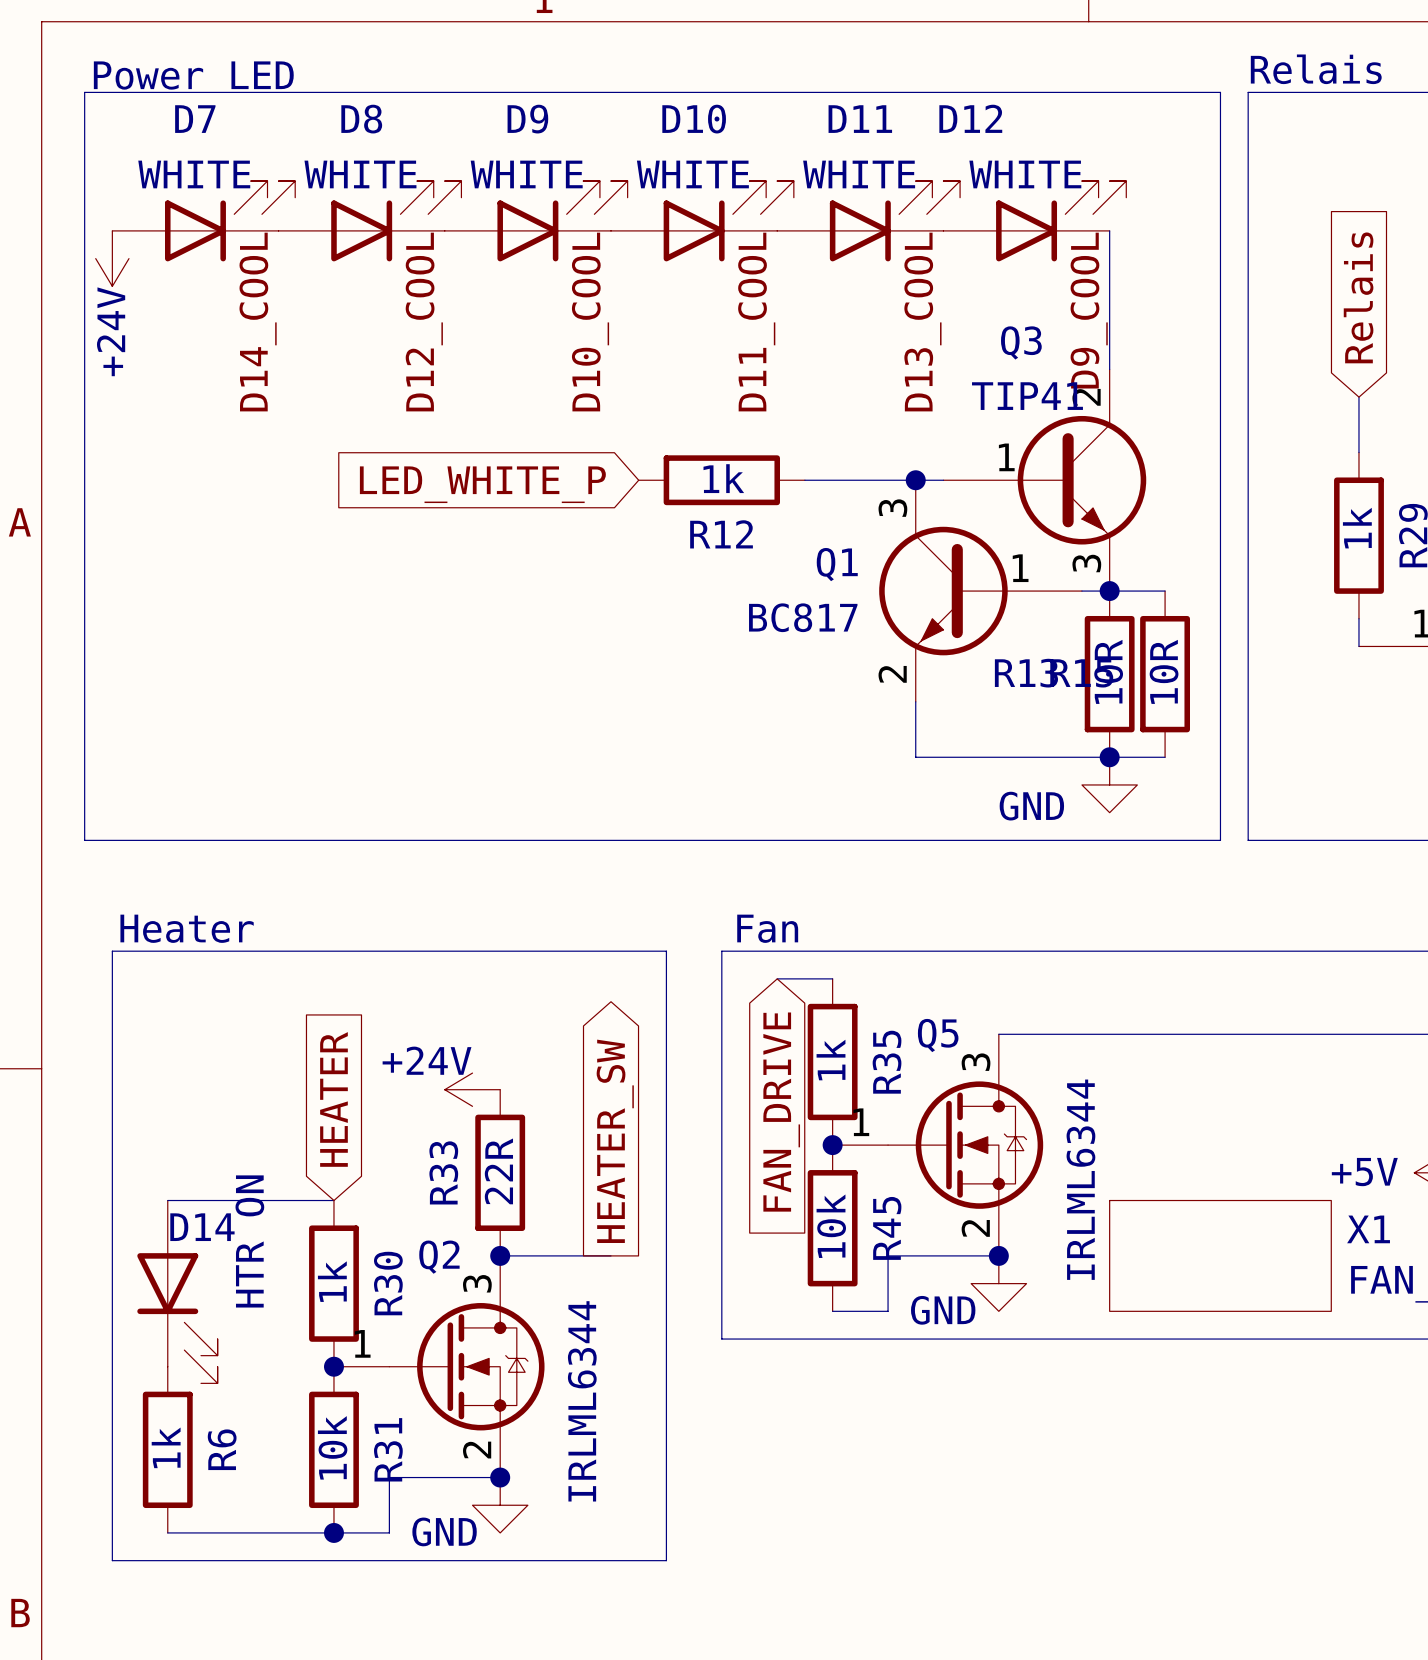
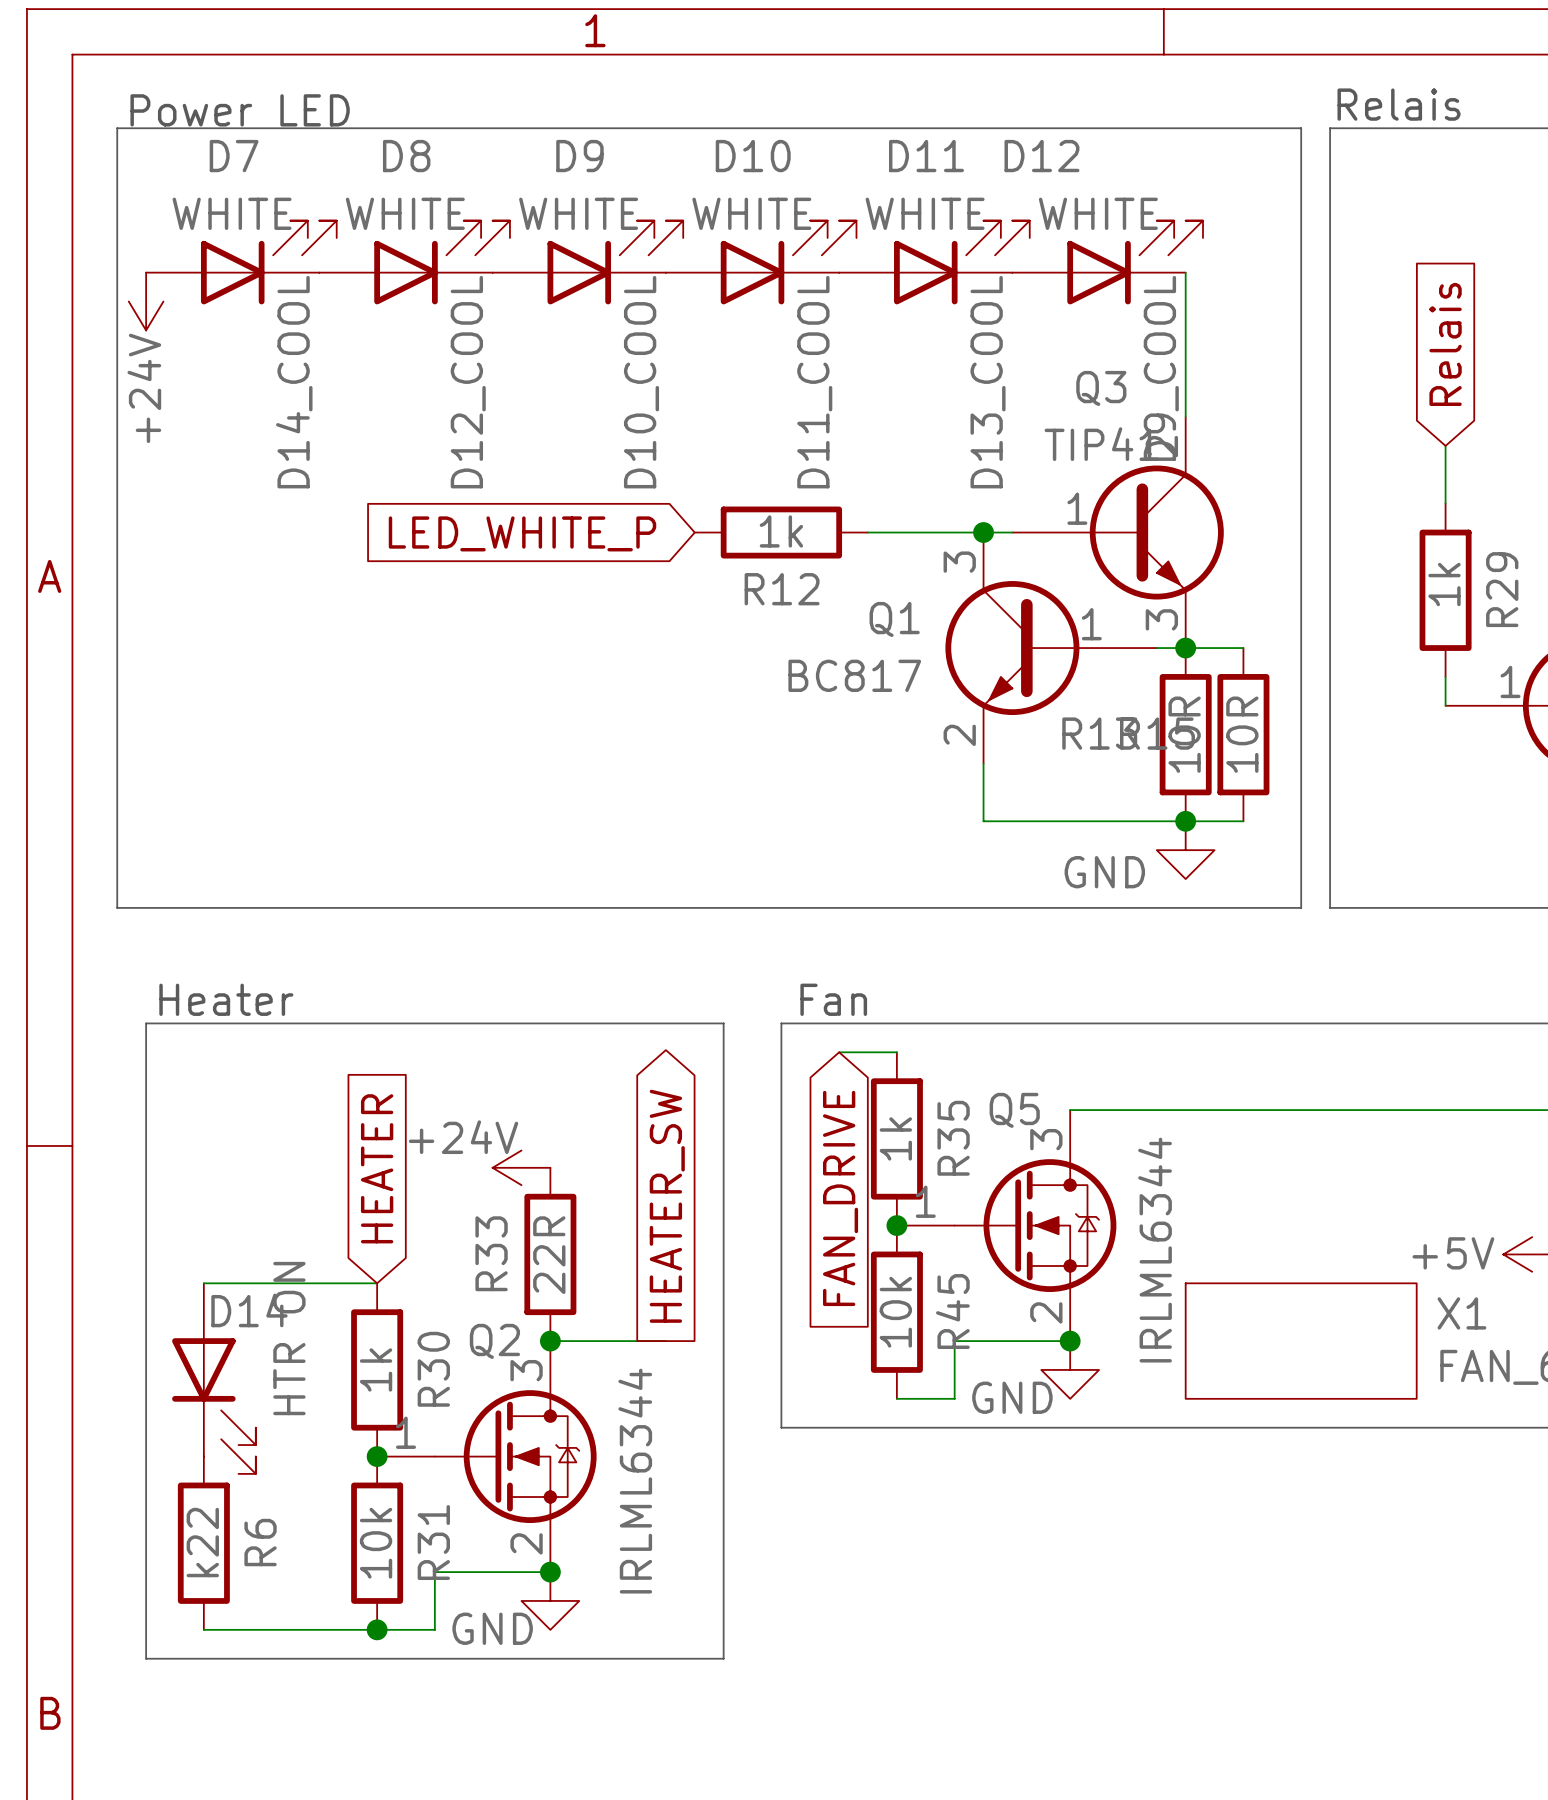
R6 value: 1k (166, 1447) -> k22 (202, 1542)

